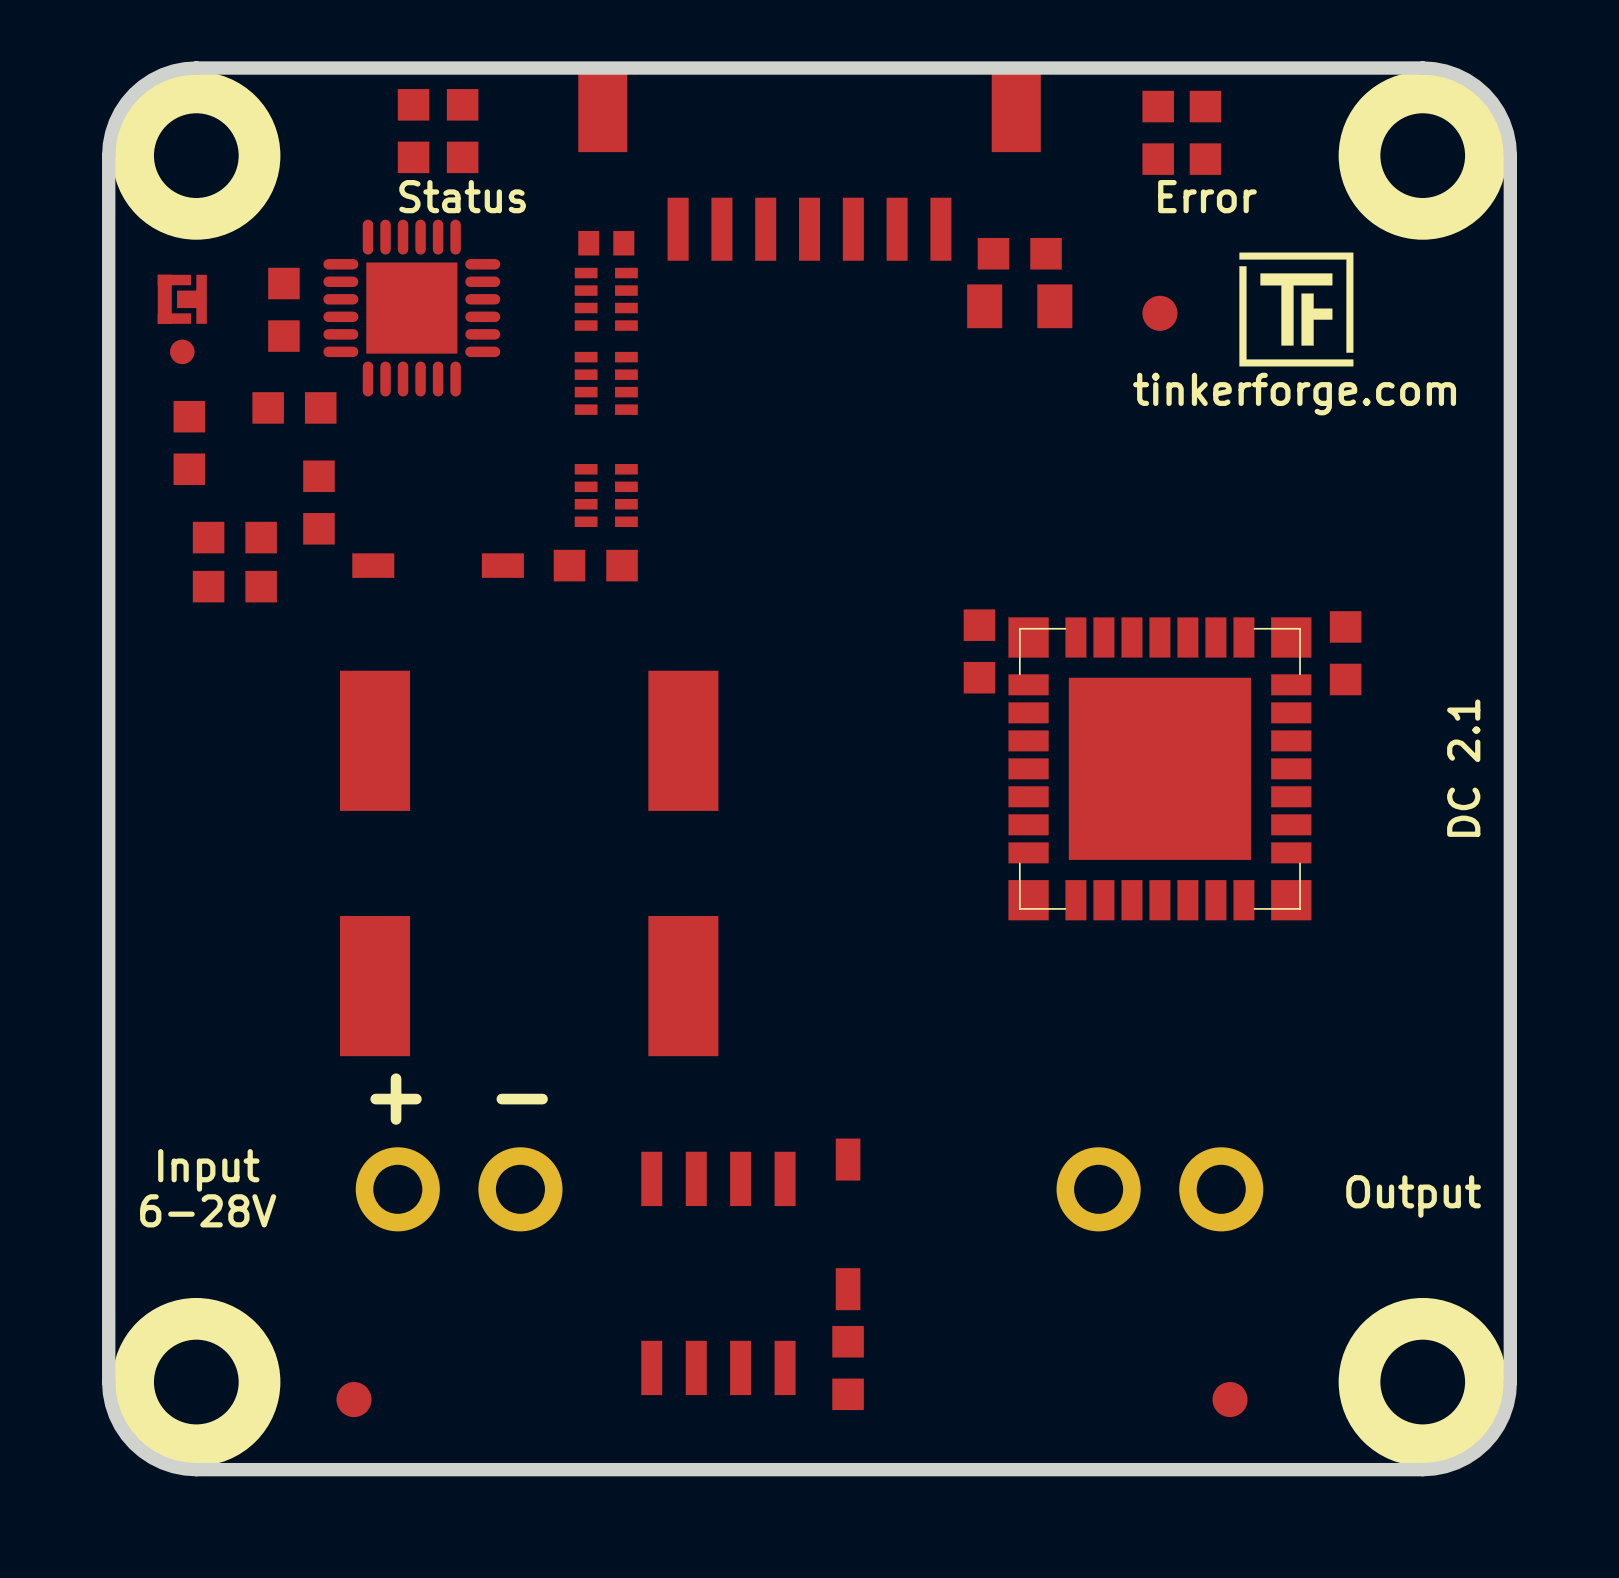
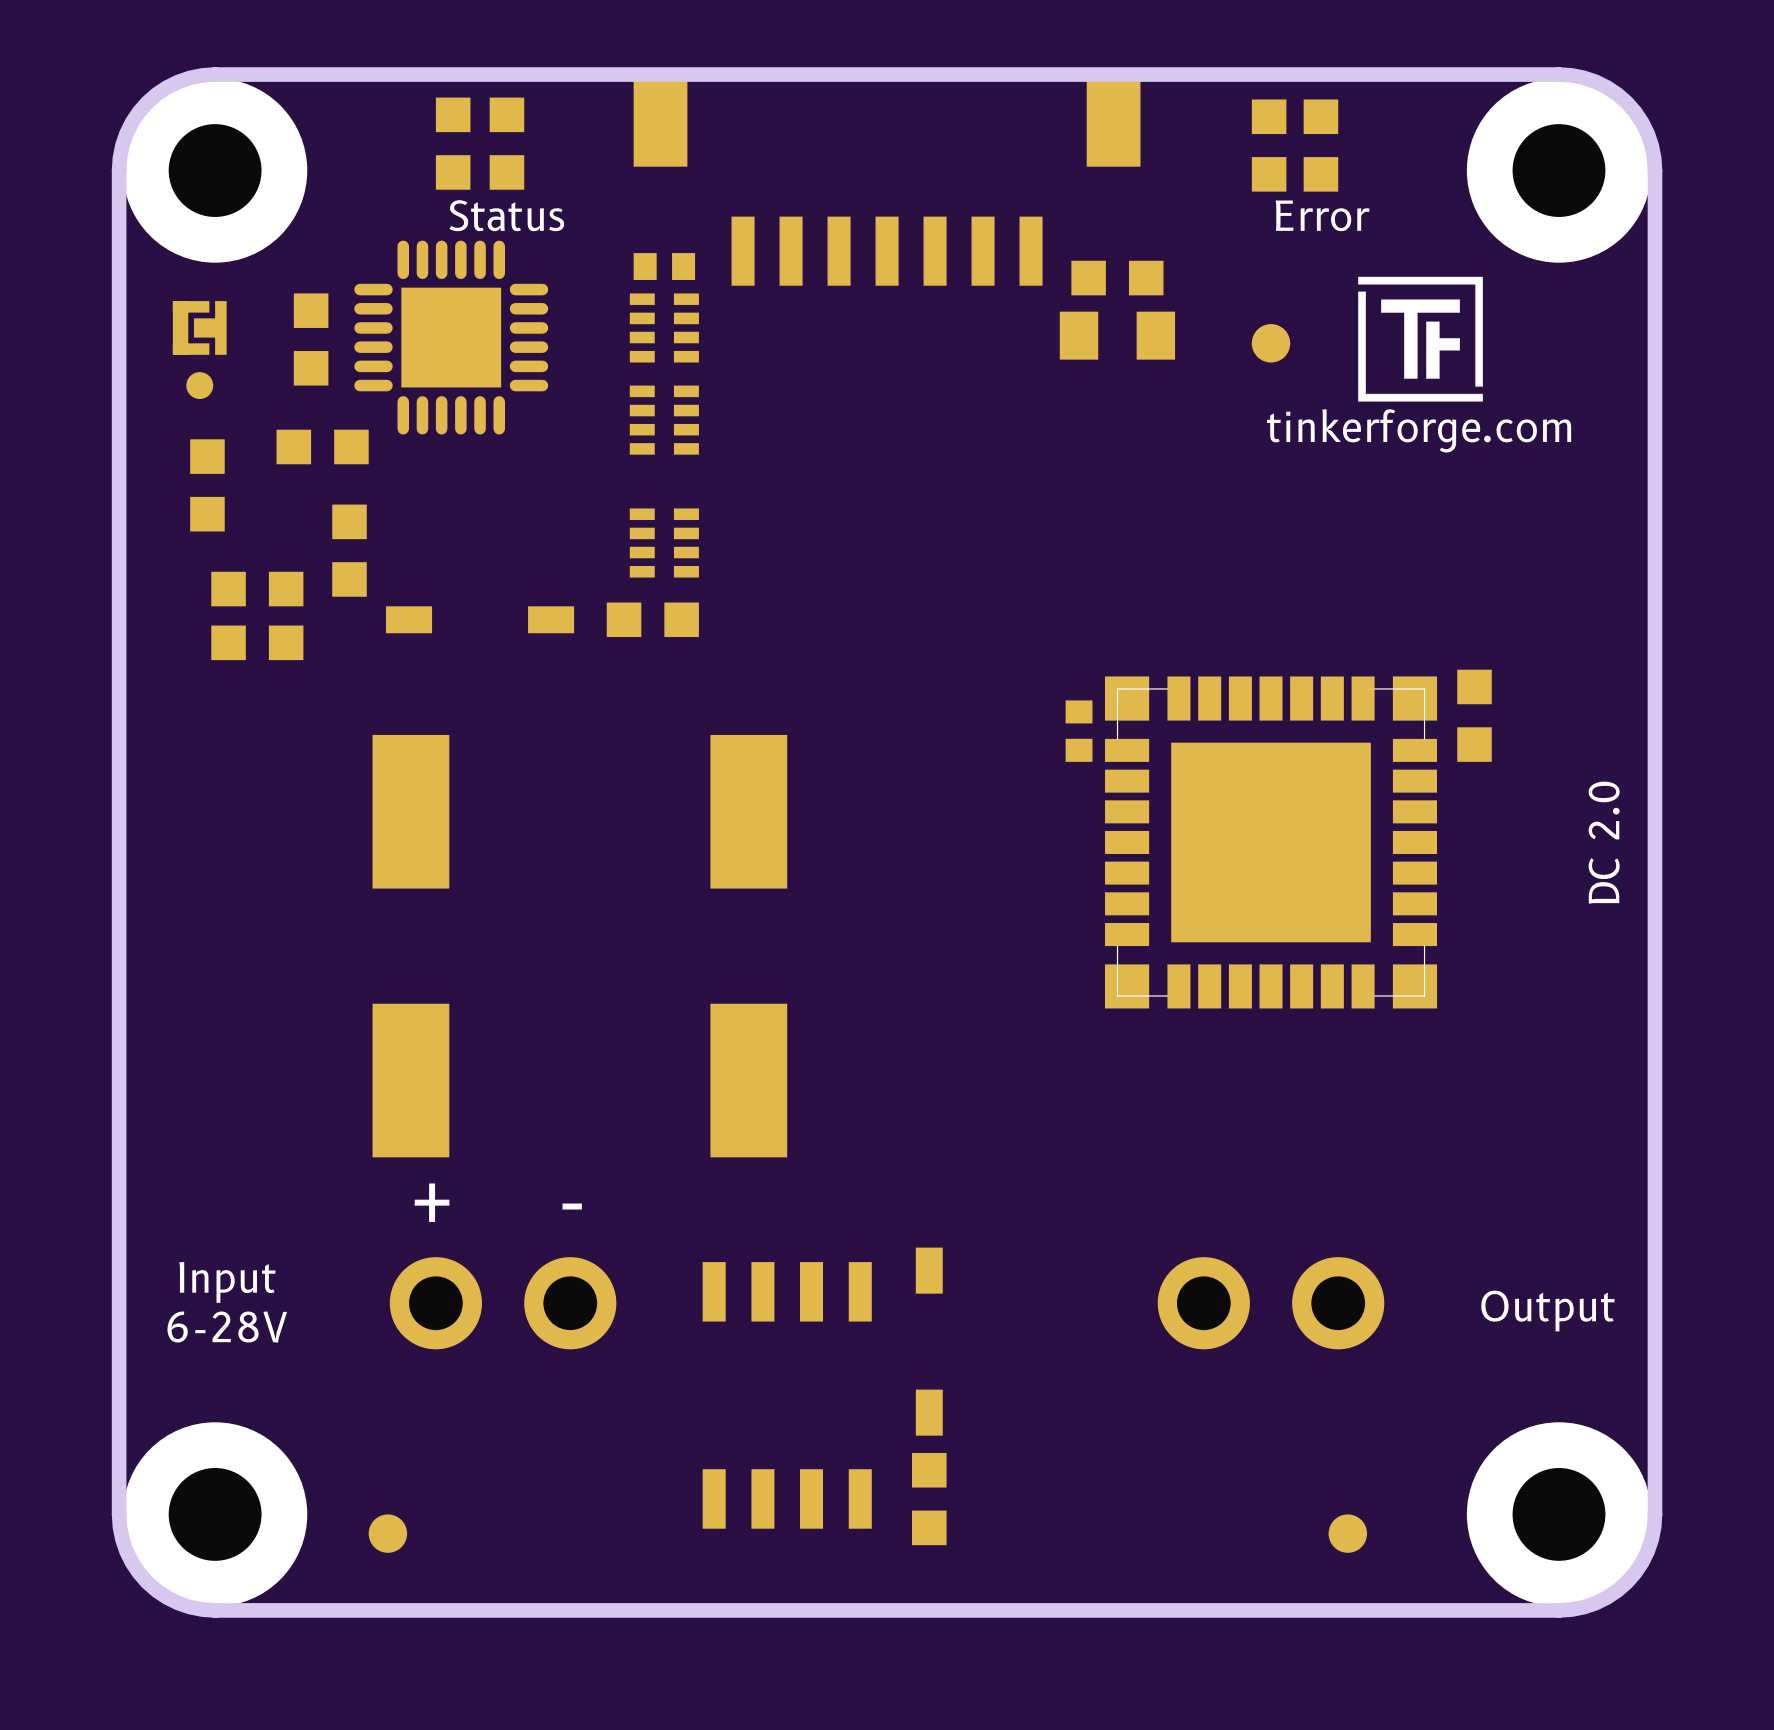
part footprint: [963, 609, 996, 694] -> [1065, 700, 1093, 762]
text: DC 2.1 (1463, 768) -> DC 2.0 (1604, 842)

